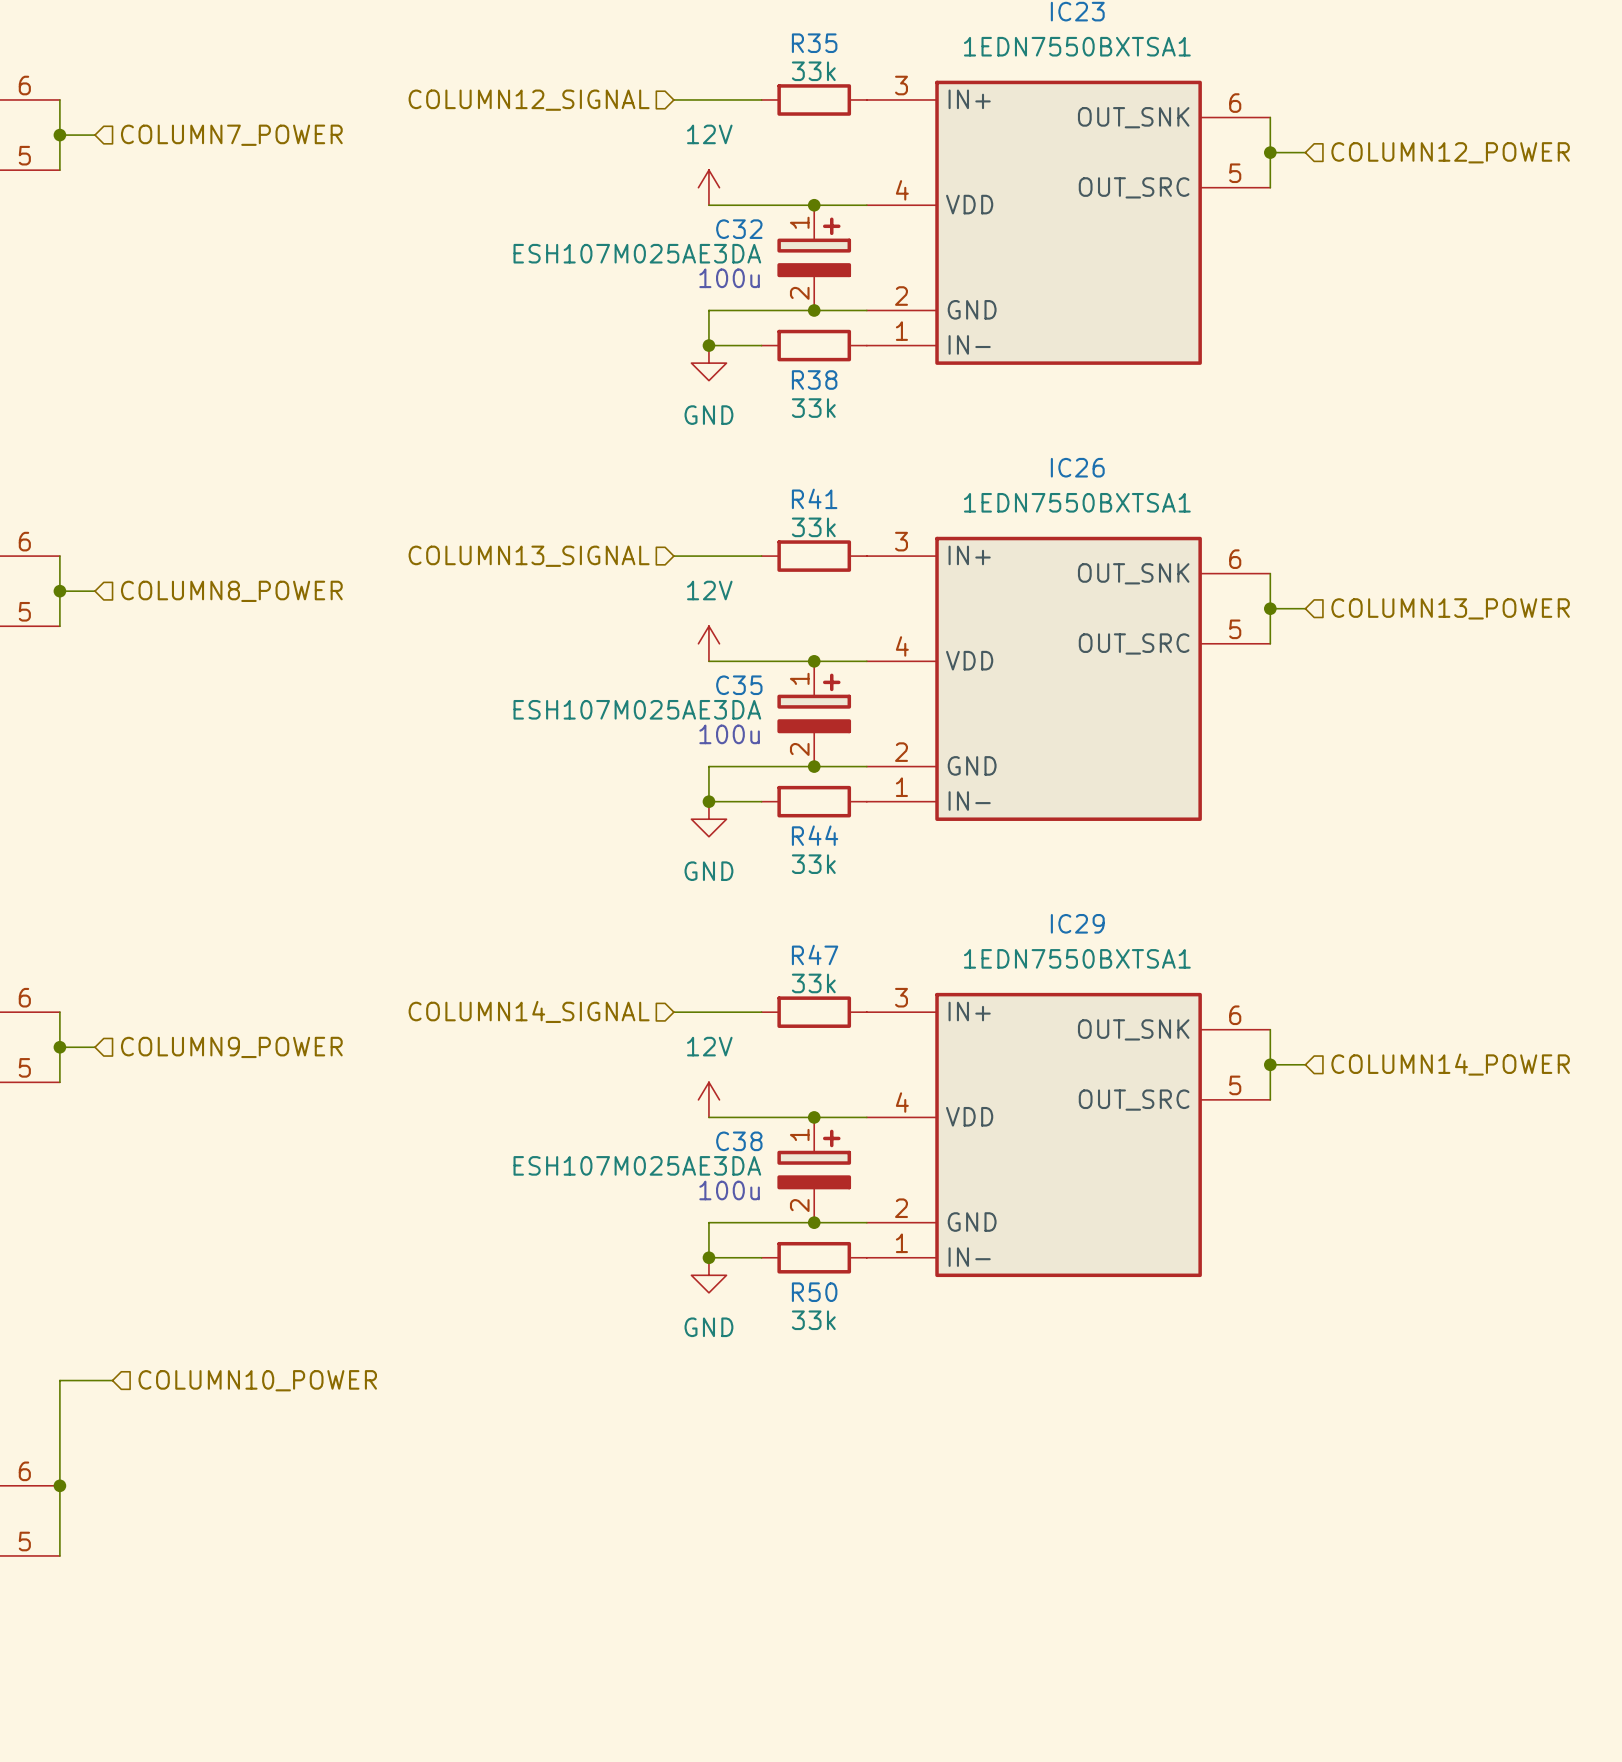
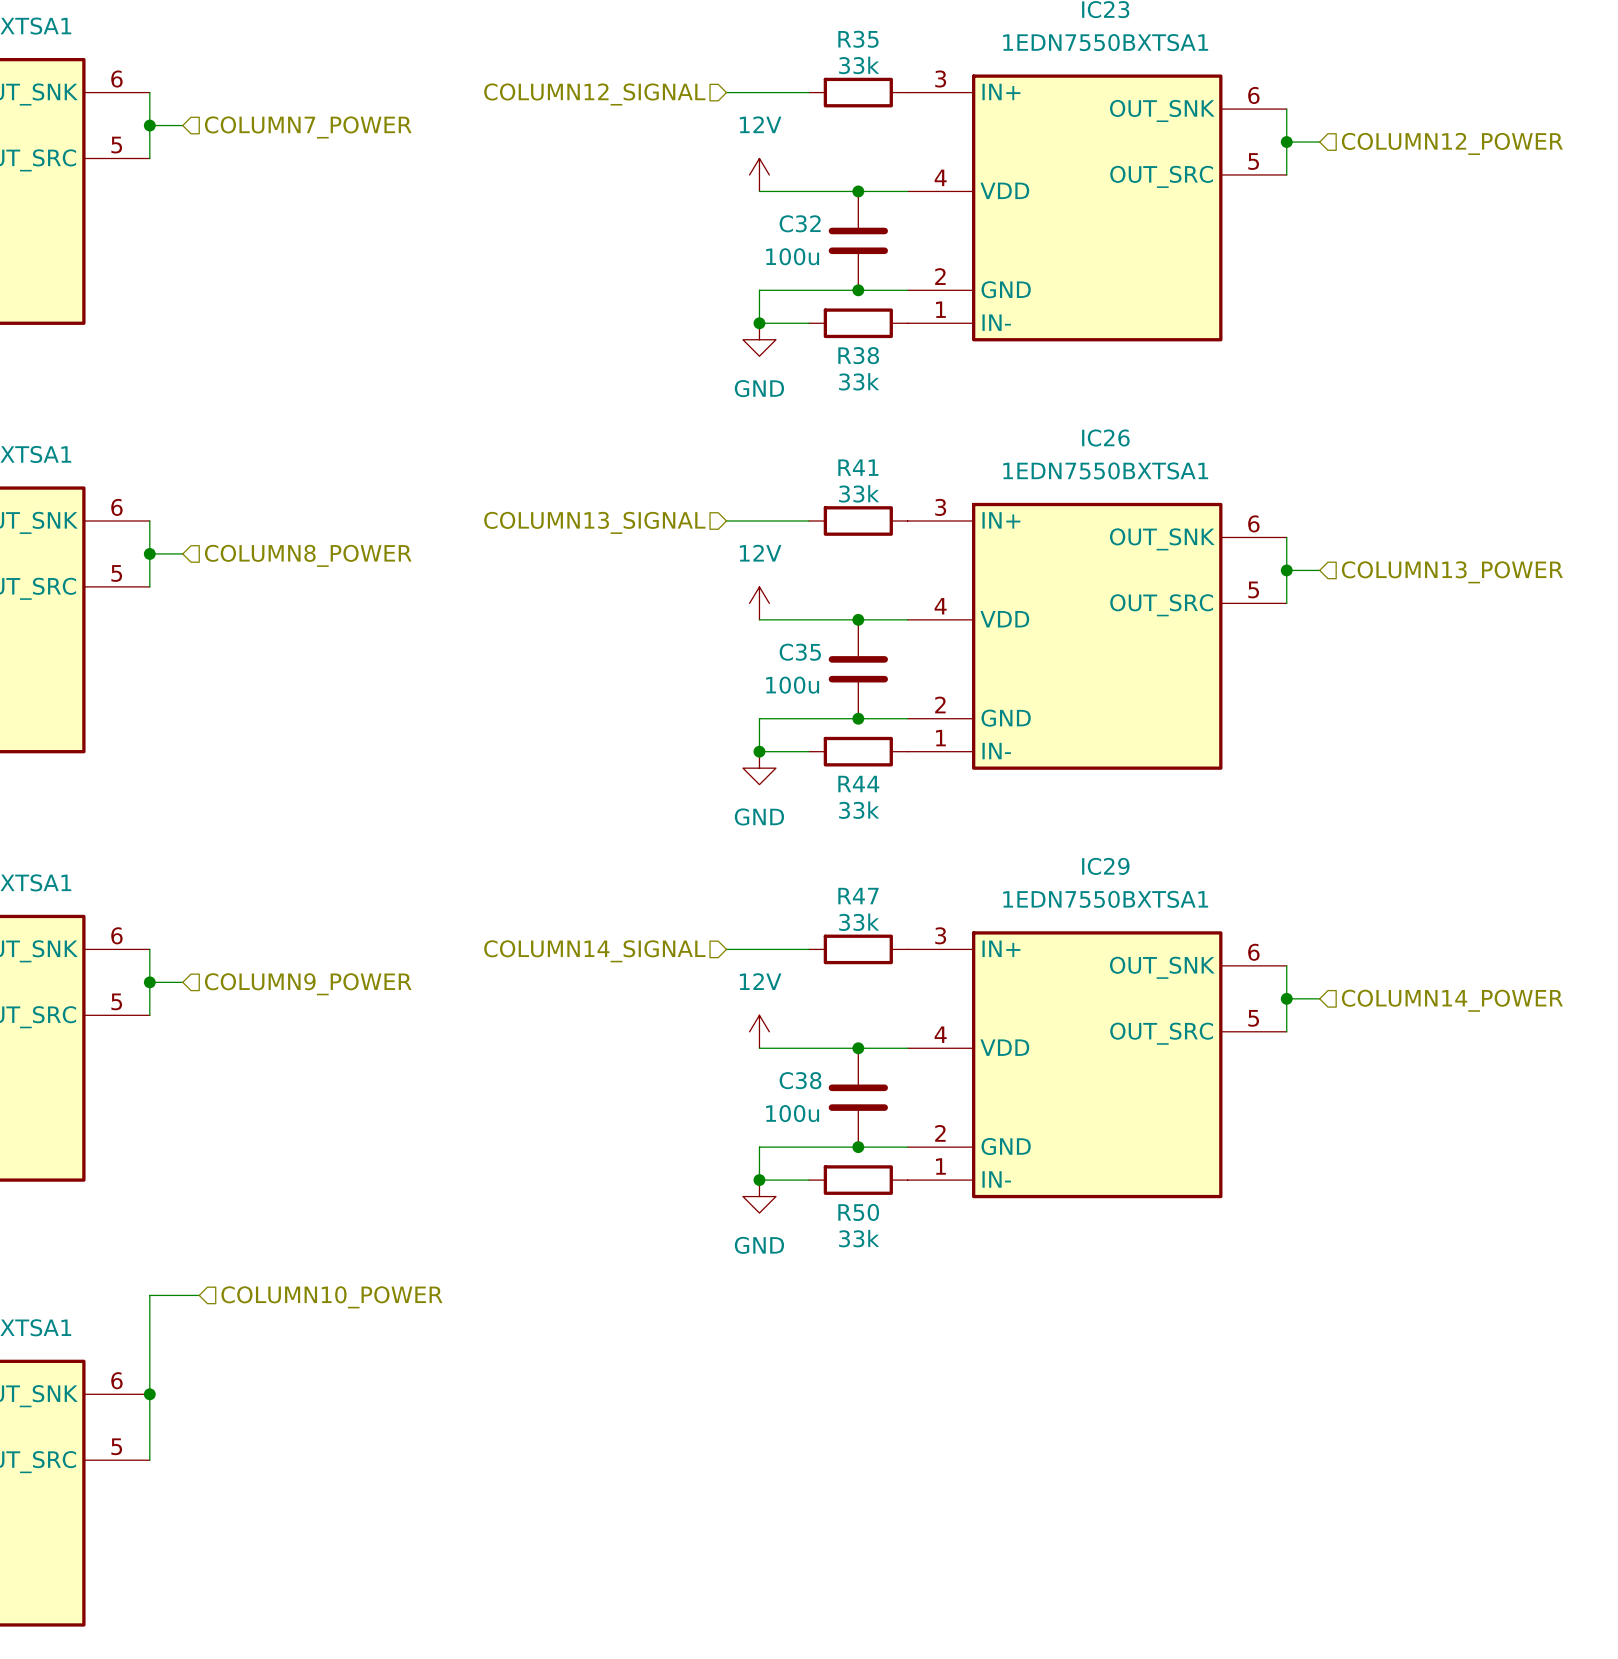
C32 symbol: [777, 205, 852, 311] -> [828, 191, 888, 291]
C32 value: ESH107M025AE3DA (637, 253) -> 100u (792, 256)
text: 100u (729, 278) -> none
C35 symbol: [777, 661, 852, 767] -> [828, 619, 888, 719]
C35 value: ESH107M025AE3DA (637, 709) -> 100u (792, 685)
text: 100u (729, 734) -> none
C38 symbol: [777, 1117, 852, 1223] -> [828, 1048, 888, 1148]
C38 value: ESH107M025AE3DA (637, 1165) -> 100u (792, 1113)
text: 100u (729, 1190) -> none

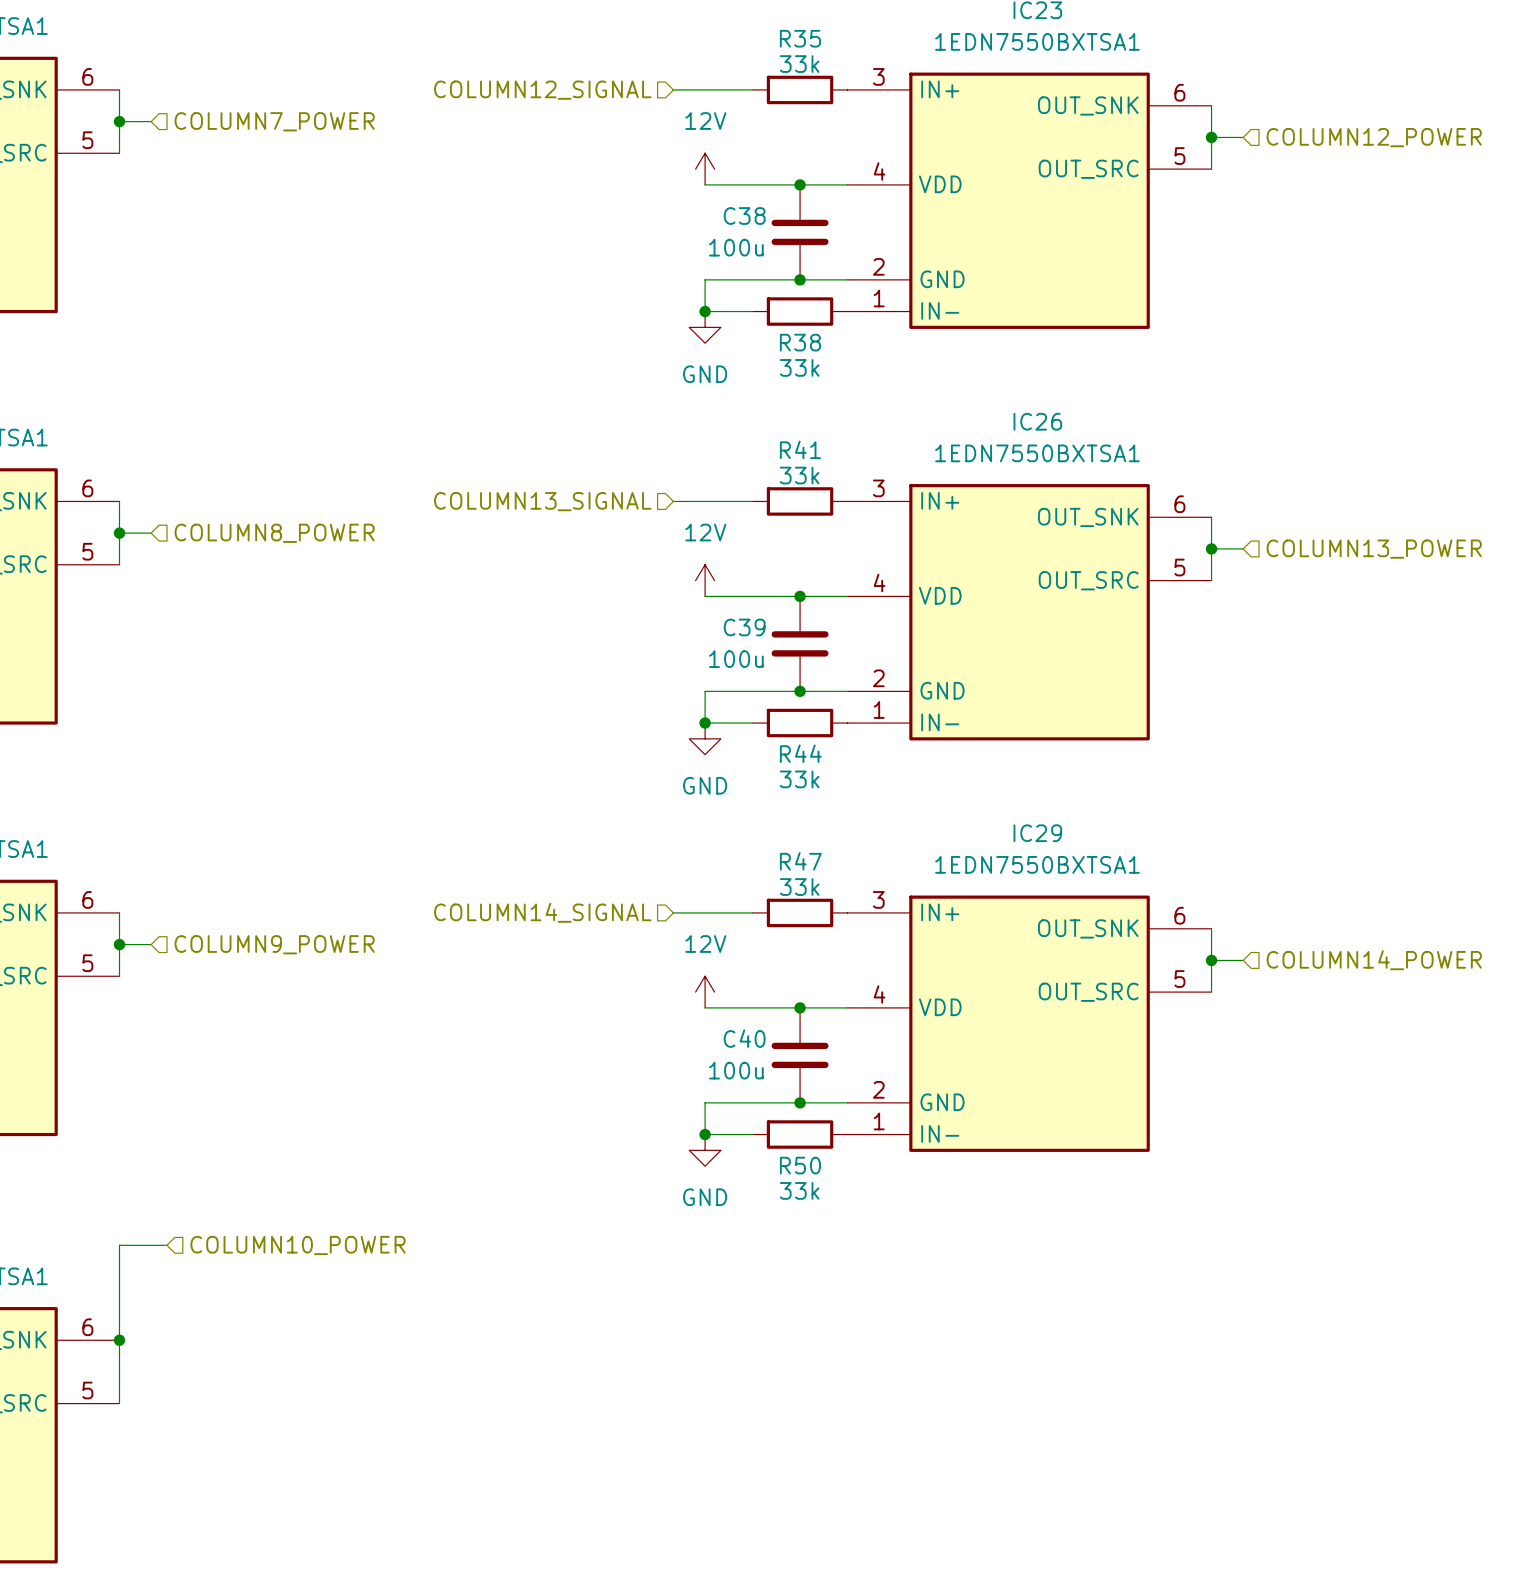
C32 name: C32 (800, 223) -> C38 (744, 215)
C35 name: C35 (800, 652) -> C39 (744, 627)
C38 name: C38 (800, 1080) -> C40 (744, 1038)

